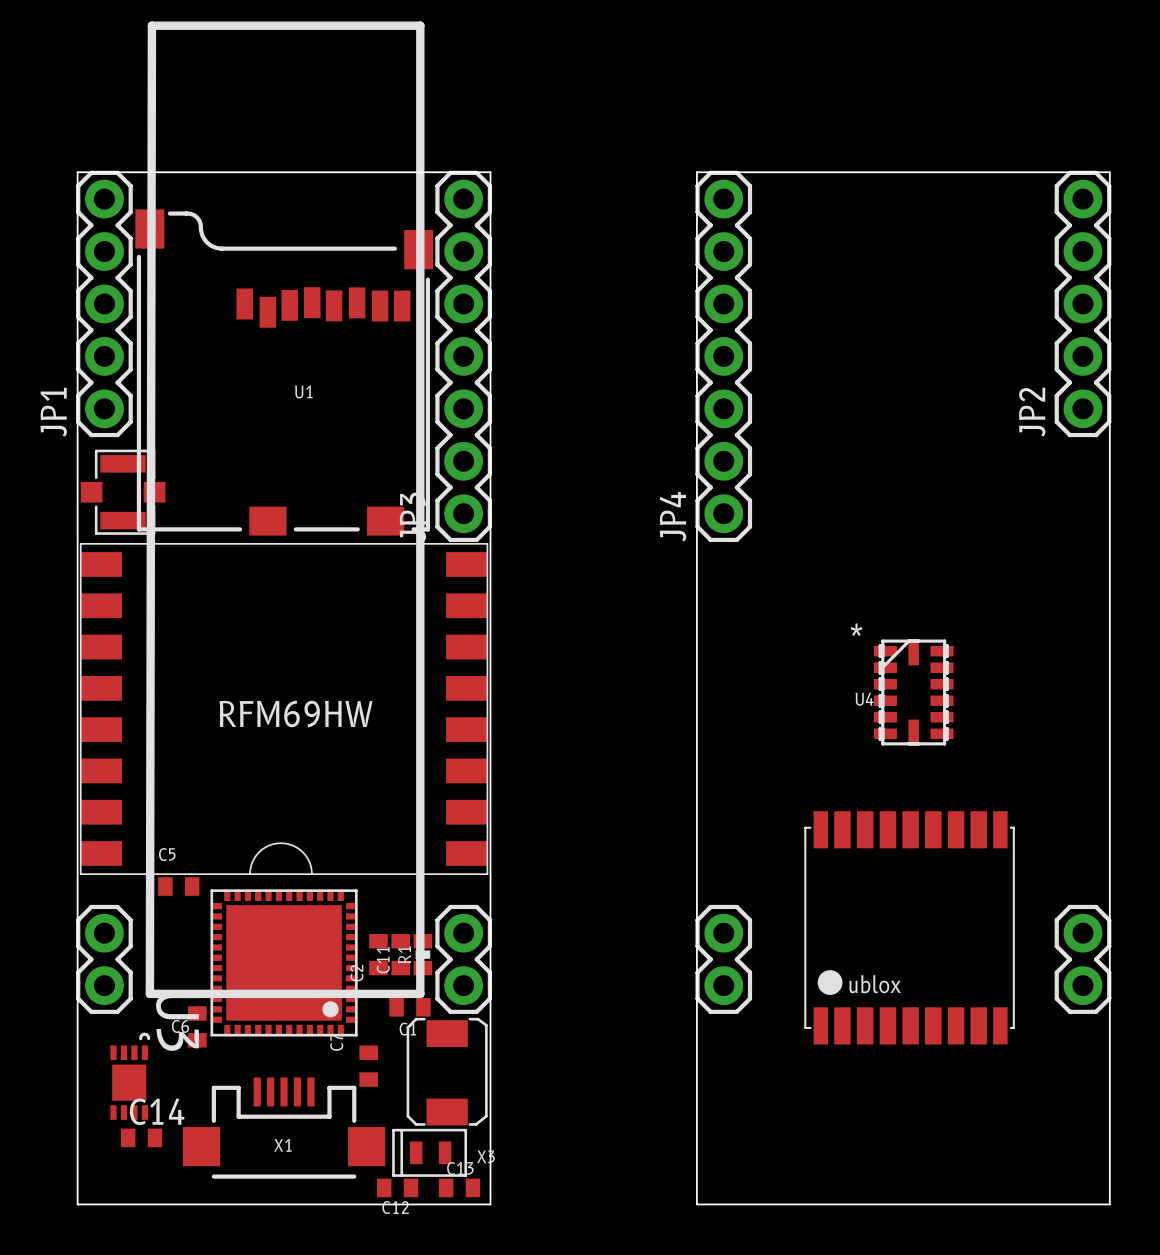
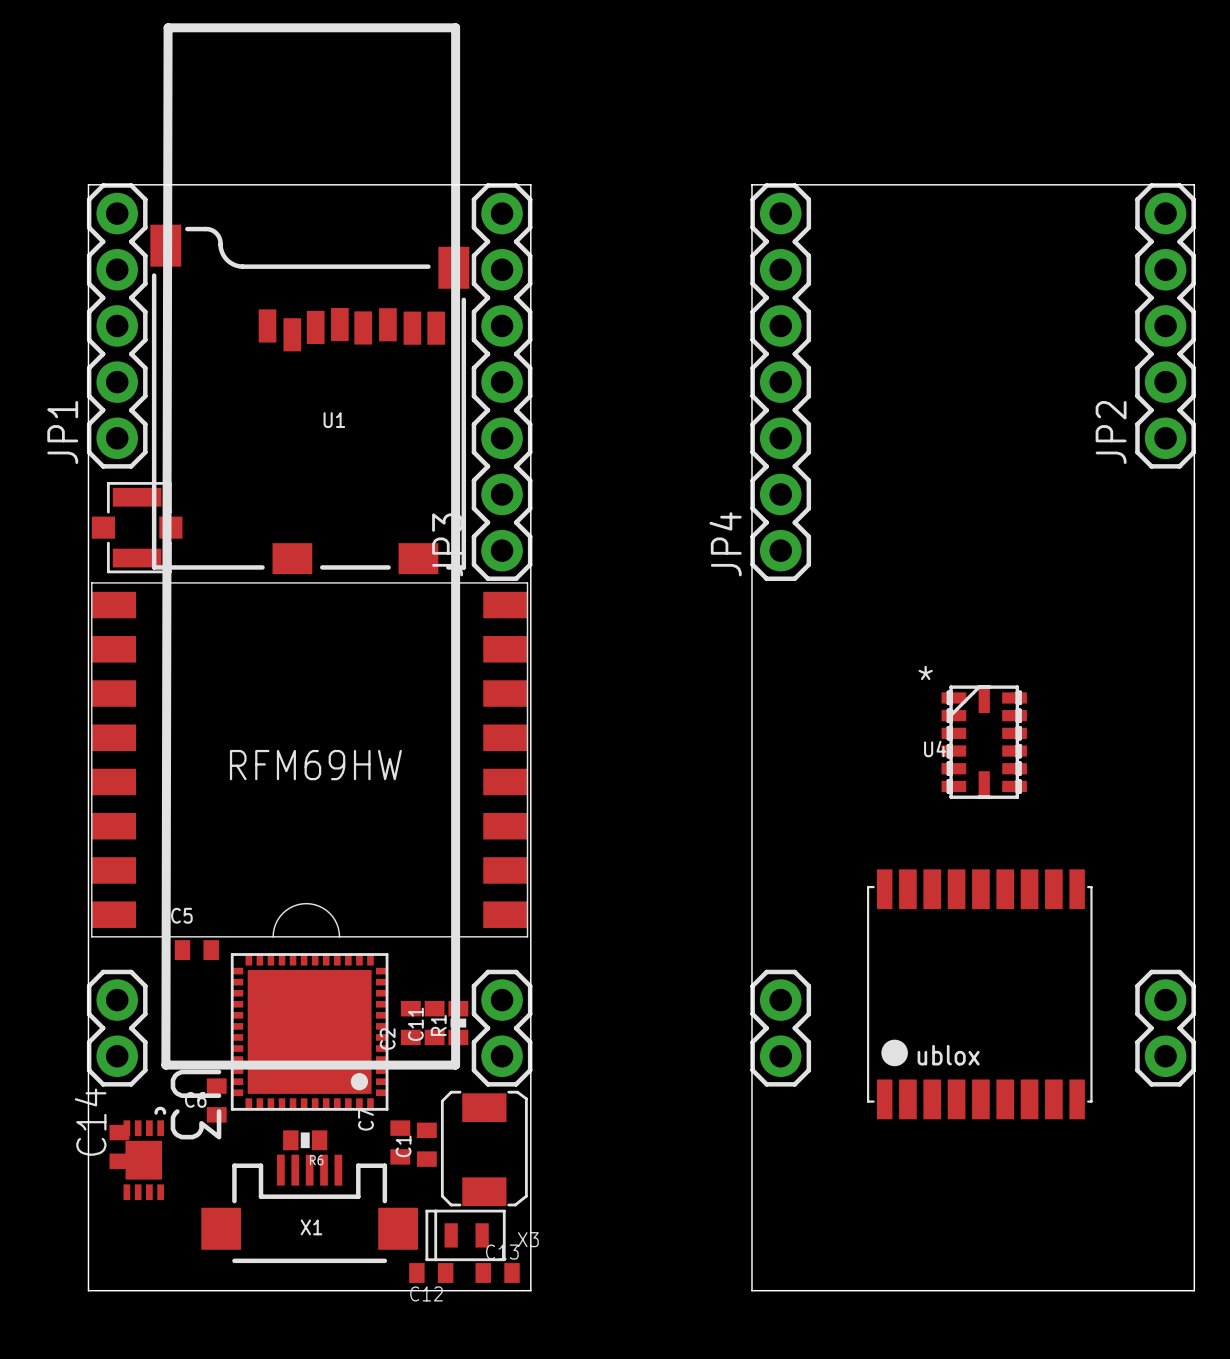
C1 rotation: 0° (409, 1007) -> 90° clockwise (426, 1144)
C1 position: (409, 1007) -> (426, 1144)
R6: none -> (305, 1140)
C14 name position: C14 (157, 1111) -> C14 (90, 1122)
C14 rotation: 0° (141, 1137) -> 90° clockwise (119, 1146)
C14 position: (141, 1137) -> (119, 1146)

